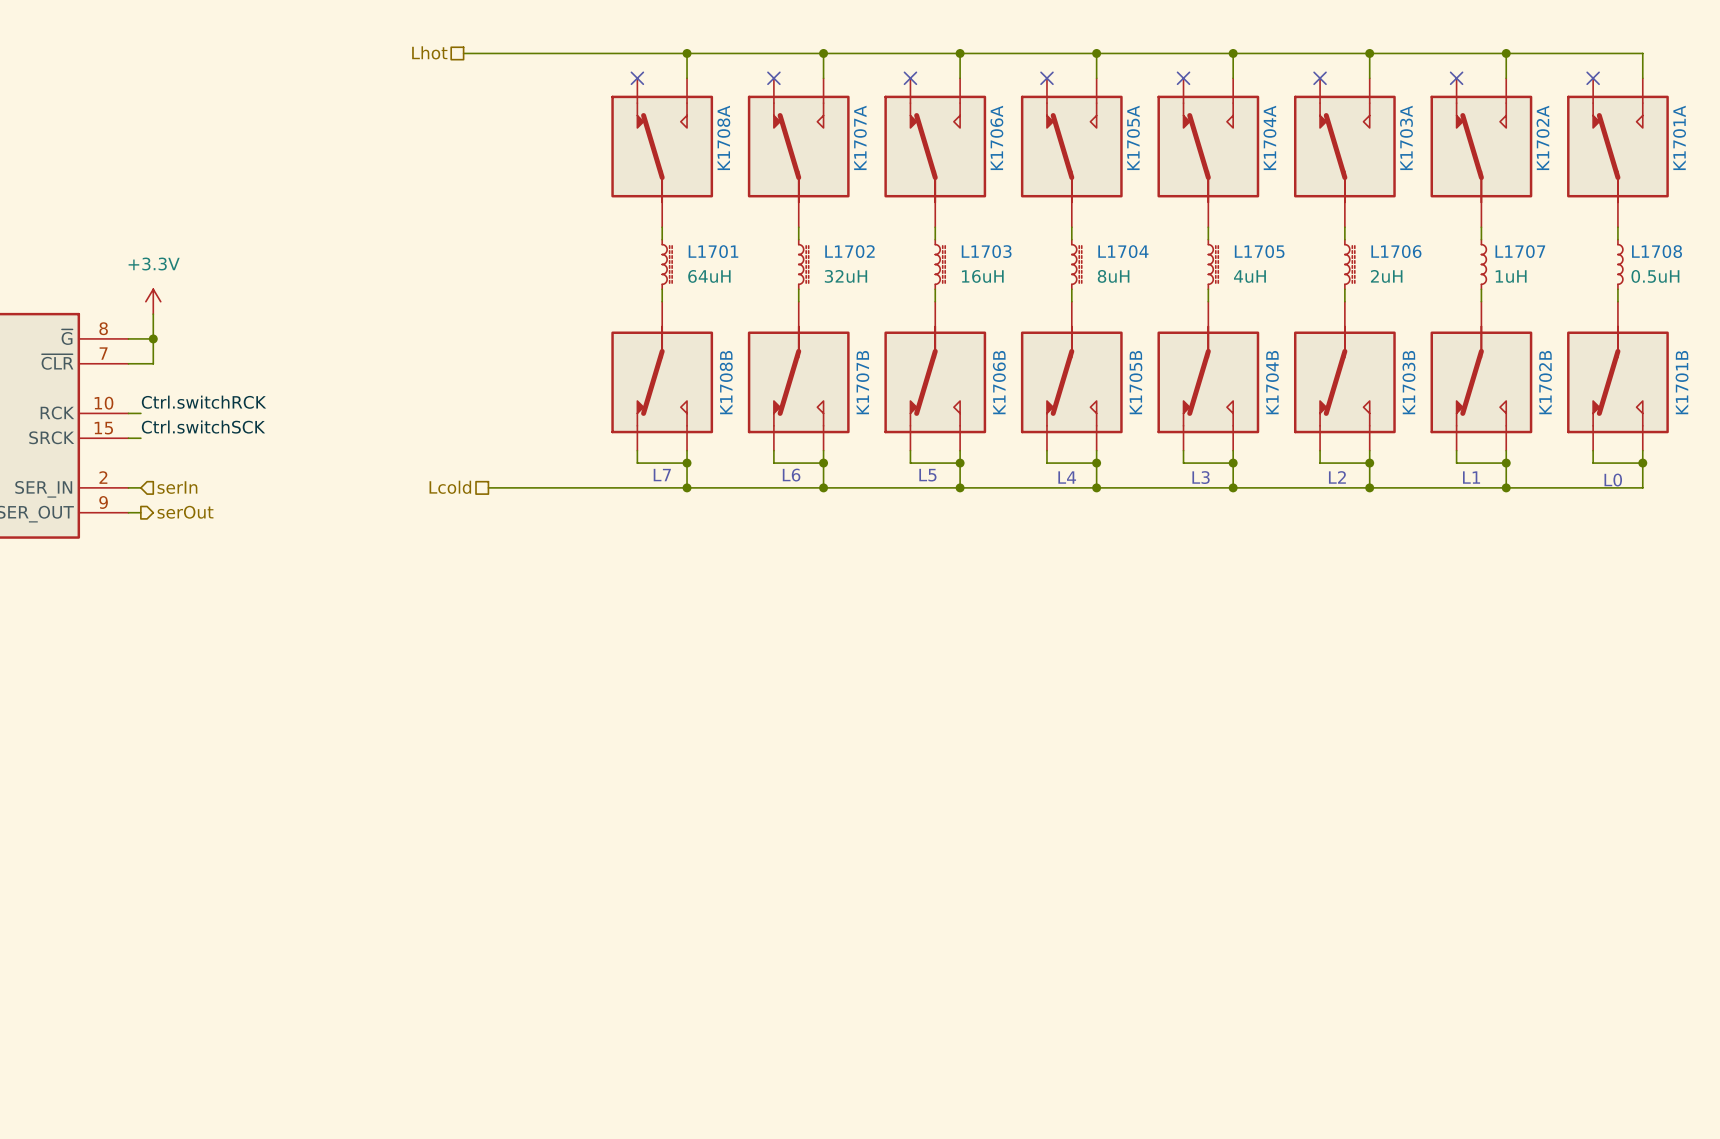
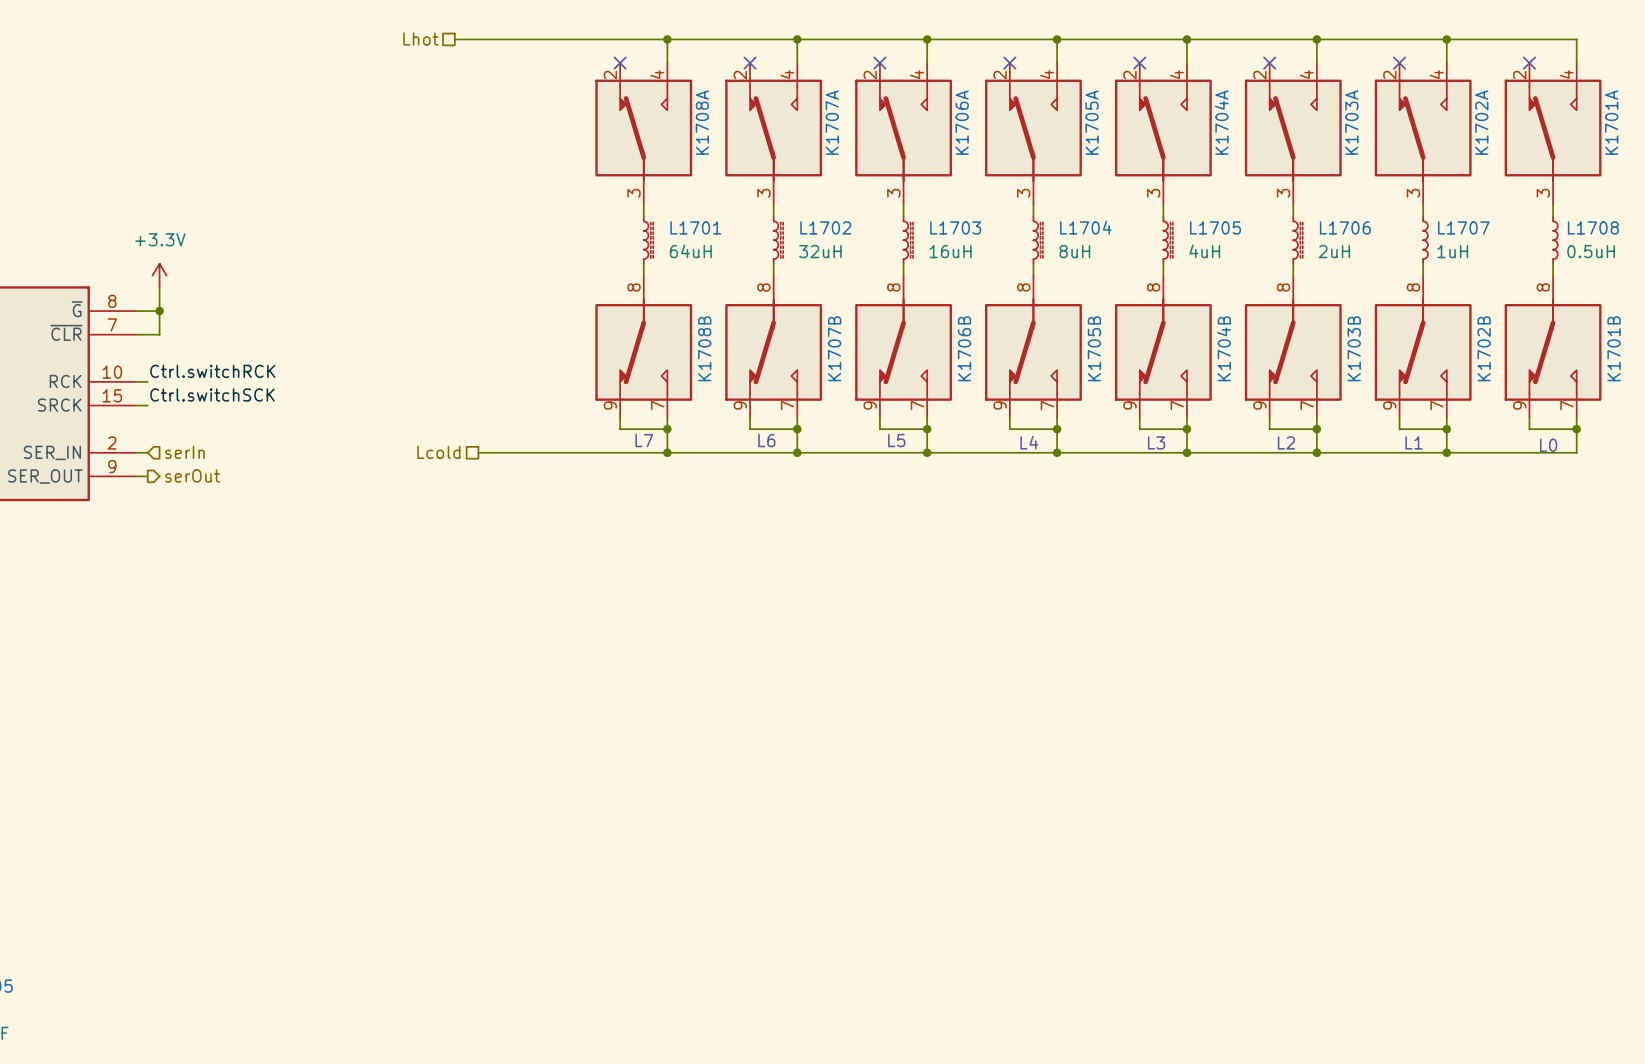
K1708A pin number: none -> 2 (610, 75)
K1708A pin number: none -> 4 (657, 74)
K1707A pin number: none -> 2 (740, 75)
K1707A pin number: none -> 4 (787, 74)
K1706A pin number: none -> 2 (870, 75)
K1706A pin number: none -> 4 (917, 74)
K1705A pin number: none -> 2 (1000, 75)
K1705A pin number: none -> 4 (1047, 74)
K1704A pin number: none -> 2 (1130, 75)
K1704A pin number: none -> 4 (1176, 74)
K1703A pin number: none -> 2 (1259, 75)
K1703A pin number: none -> 4 (1306, 74)
K1702A pin number: none -> 2 (1389, 75)
K1702A pin number: none -> 4 (1436, 74)
K1701A pin number: none -> 2 (1519, 75)
K1701A pin number: none -> 4 (1566, 74)
K1708A pin number: none -> 3 (634, 193)
K1707A pin number: none -> 3 (763, 193)
K1706A pin number: none -> 3 (893, 193)
K1705A pin number: none -> 3 (1023, 193)
K1704A pin number: none -> 3 (1153, 193)
K1703A pin number: none -> 3 (1283, 193)
K1702A pin number: none -> 3 (1413, 193)
K1701A pin number: none -> 3 (1543, 193)
K1708B pin number: none -> 8 (634, 287)
K1707B pin number: none -> 8 (763, 287)
K1706B pin number: none -> 8 (893, 287)
K1705B pin number: none -> 8 (1023, 287)
K1704B pin number: none -> 8 (1153, 287)
K1703B pin number: none -> 8 (1283, 287)
K1702B pin number: none -> 8 (1413, 287)
K1701B pin number: none -> 8 (1543, 287)
K1708B pin number: none -> 9 (610, 405)
K1708B pin number: none -> 7 (657, 405)
K1707B pin number: none -> 9 (740, 405)
K1707B pin number: none -> 7 (787, 405)
K1706B pin number: none -> 9 (870, 405)
K1706B pin number: none -> 7 (917, 405)
K1705B pin number: none -> 9 (1000, 405)
K1705B pin number: none -> 7 (1047, 405)
K1704B pin number: none -> 9 (1130, 405)
K1704B pin number: none -> 7 (1177, 405)
K1703B pin number: none -> 9 (1259, 405)
K1703B pin number: none -> 7 (1307, 405)
K1702B pin number: none -> 9 (1389, 405)
K1702B pin number: none -> 7 (1437, 405)
K1701B pin number: none -> 9 (1519, 405)
K1701B pin number: none -> 7 (1566, 405)

